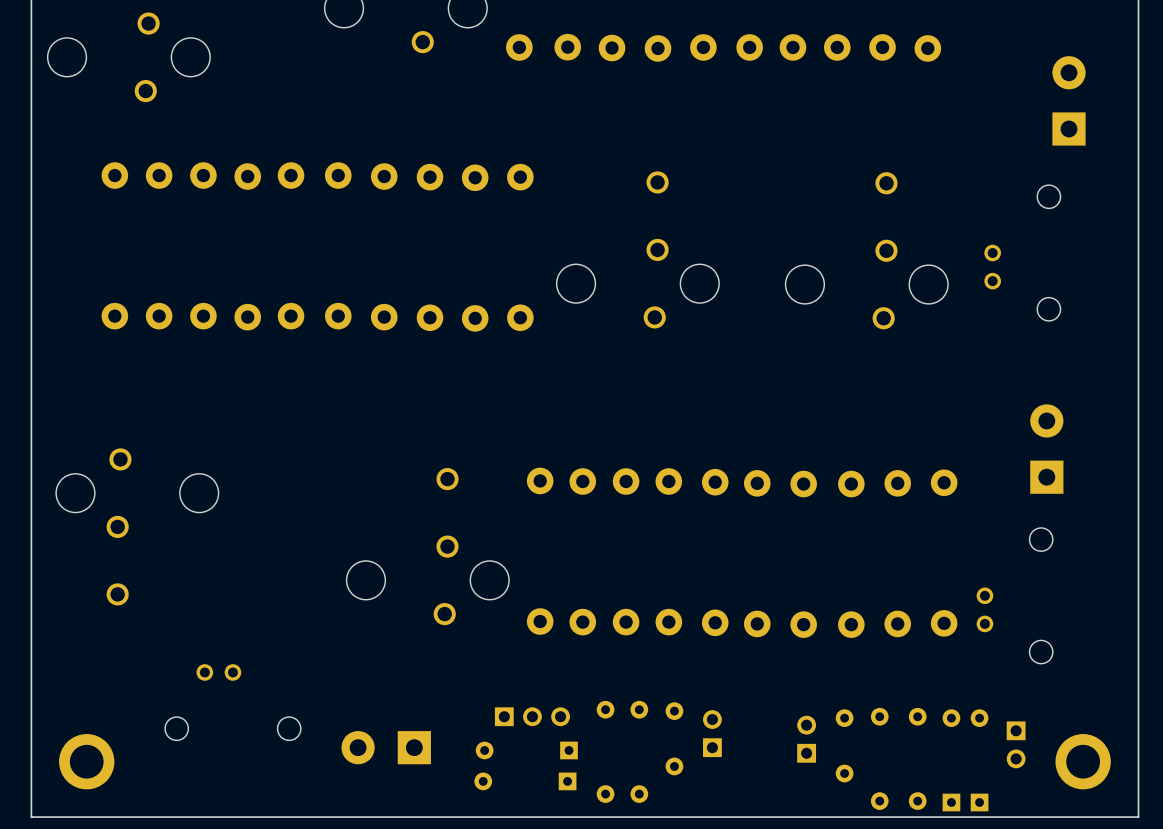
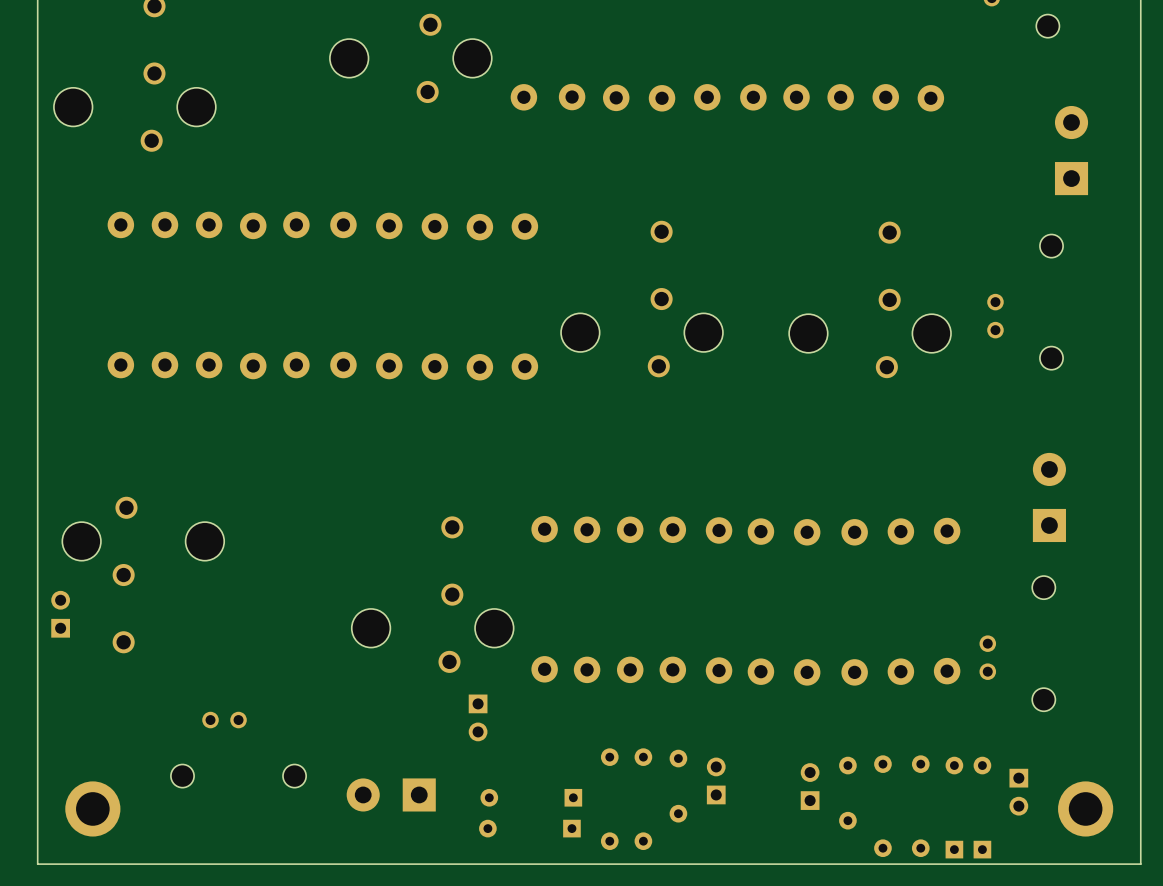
part: none -> (60, 614)
part: none -> (478, 717)
part: (532, 716) -> none

